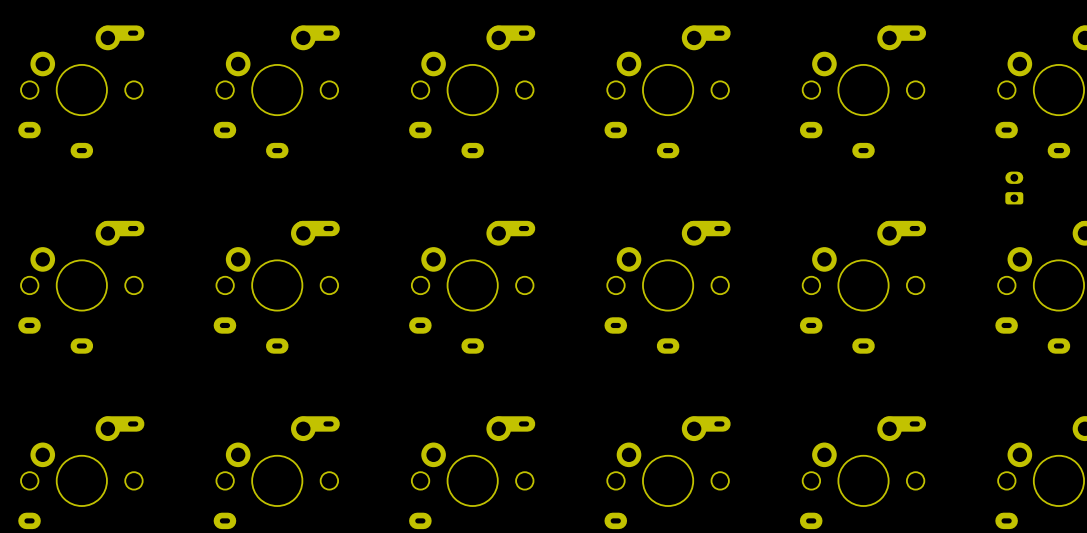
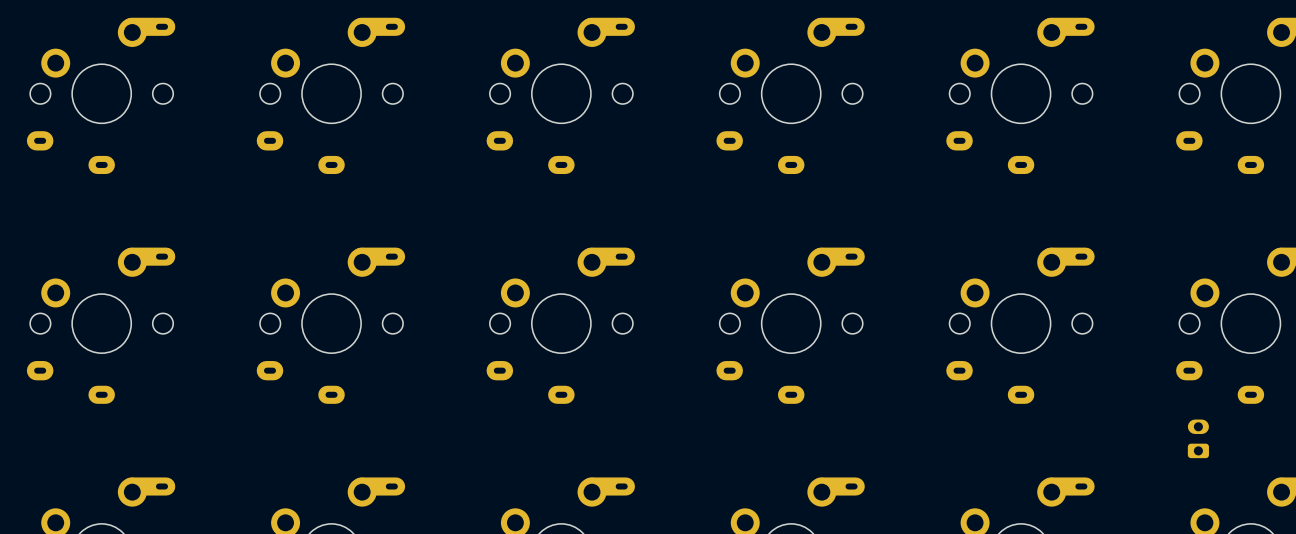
part position: (1014, 188) -> (1198, 438)

